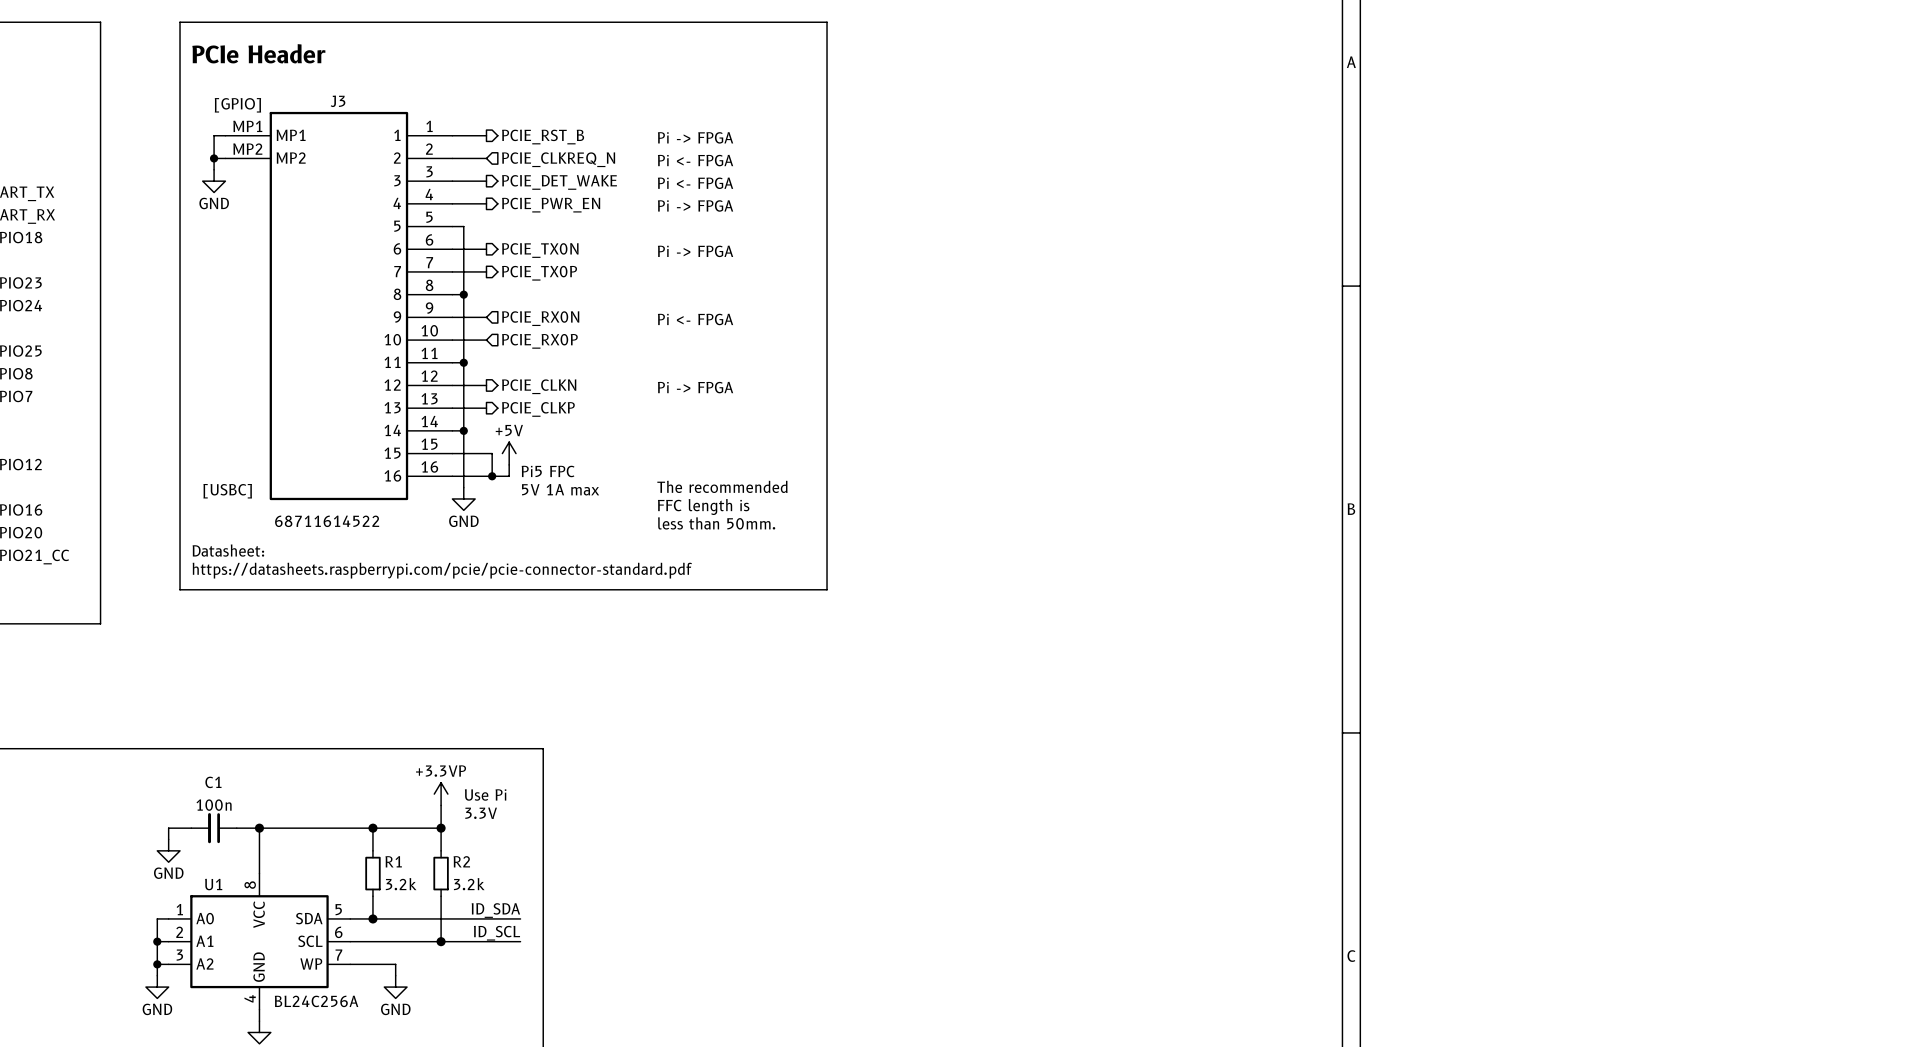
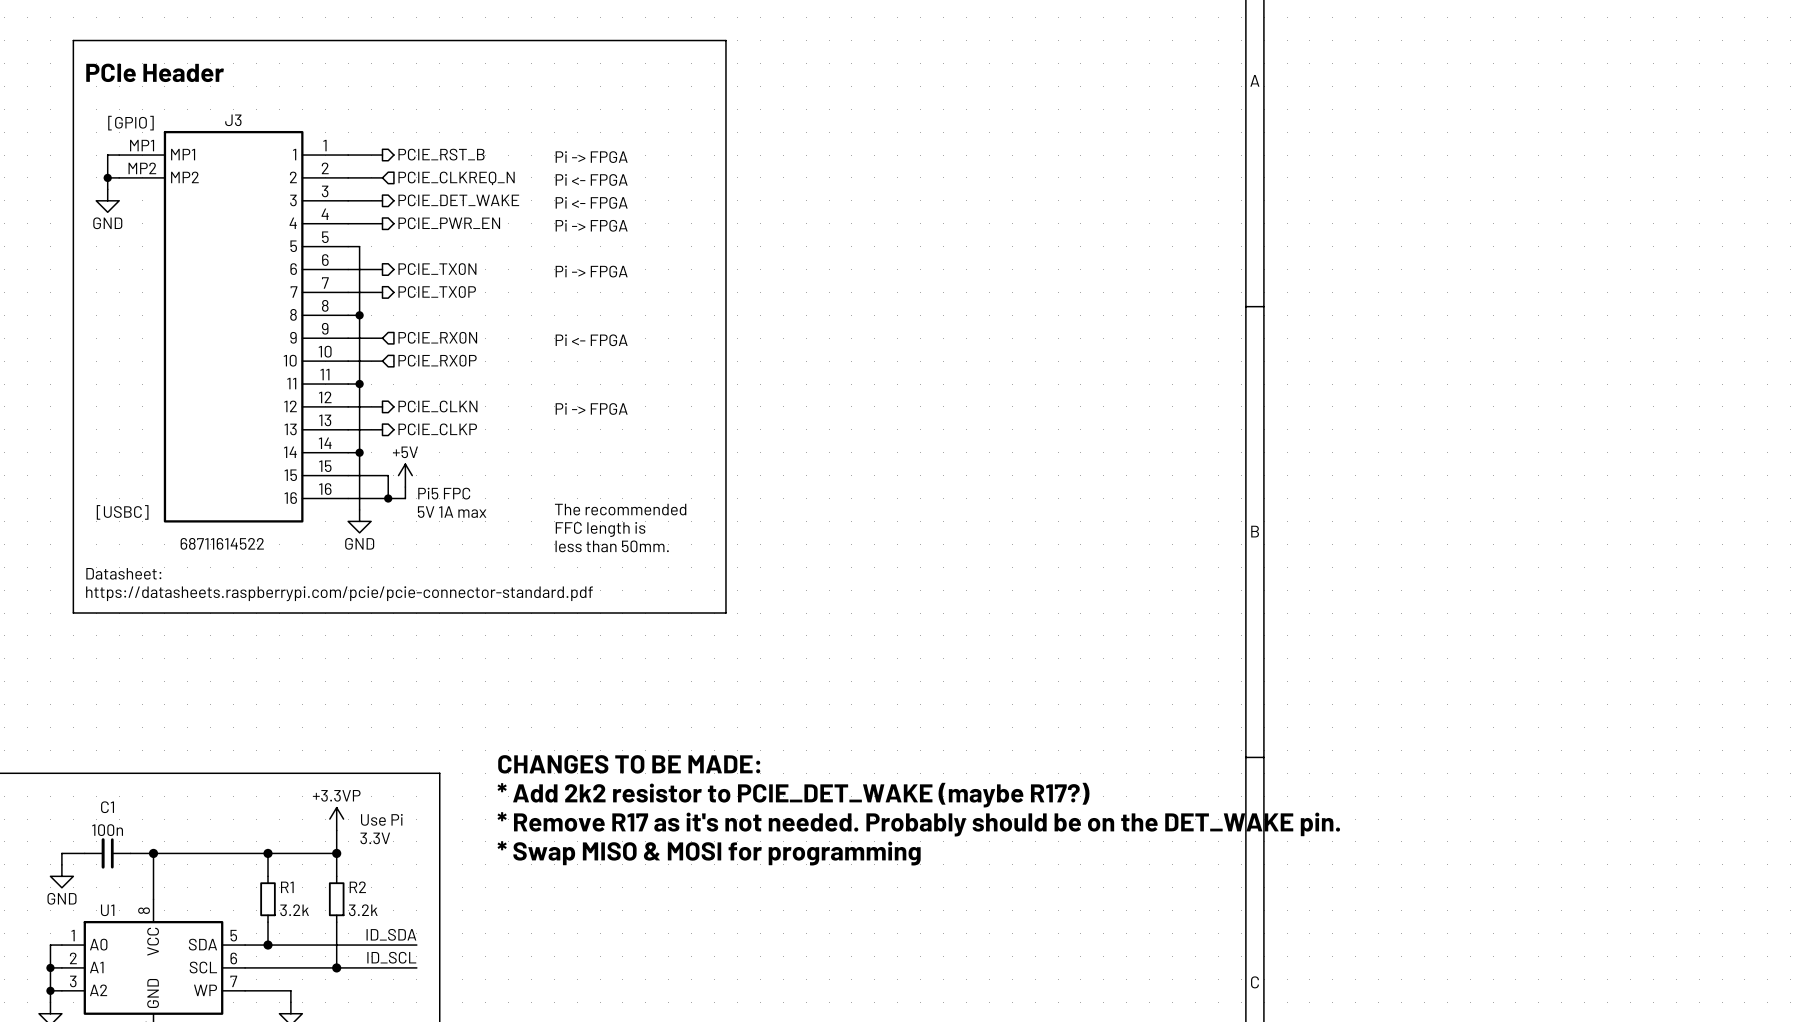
text: none -> CHANGES TO BE MADE: (629, 764)
text: none -> * Add 2k2 resistor to PCIE_DET_WAKE (maybe R17?) (793, 795)
text: none -> * Remove R17 as it's not needed. Probably should be on the DET_WAKE pin. (918, 824)
text: none -> * Swap MISO & MOSI for programming (709, 853)

